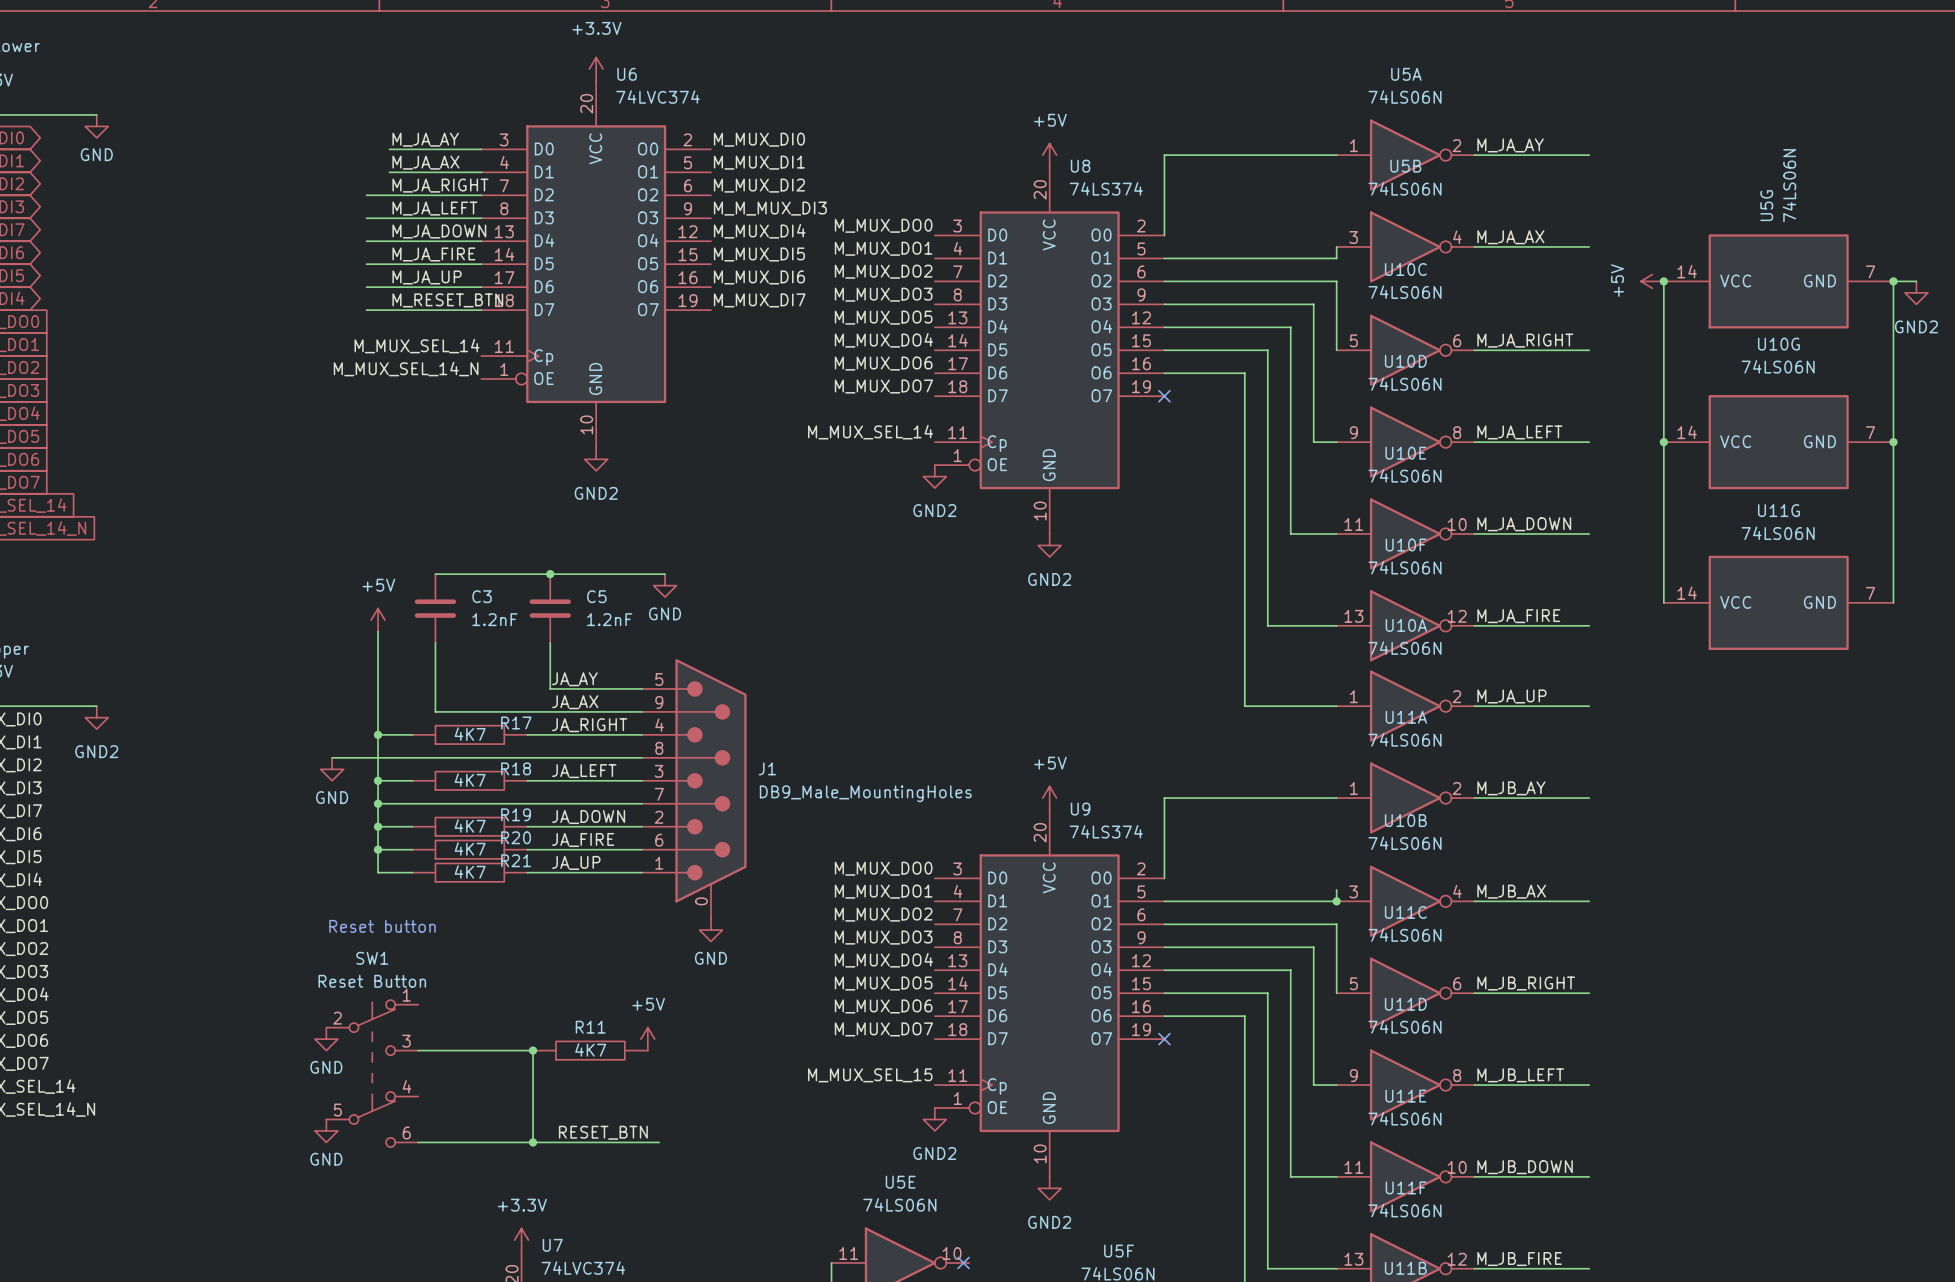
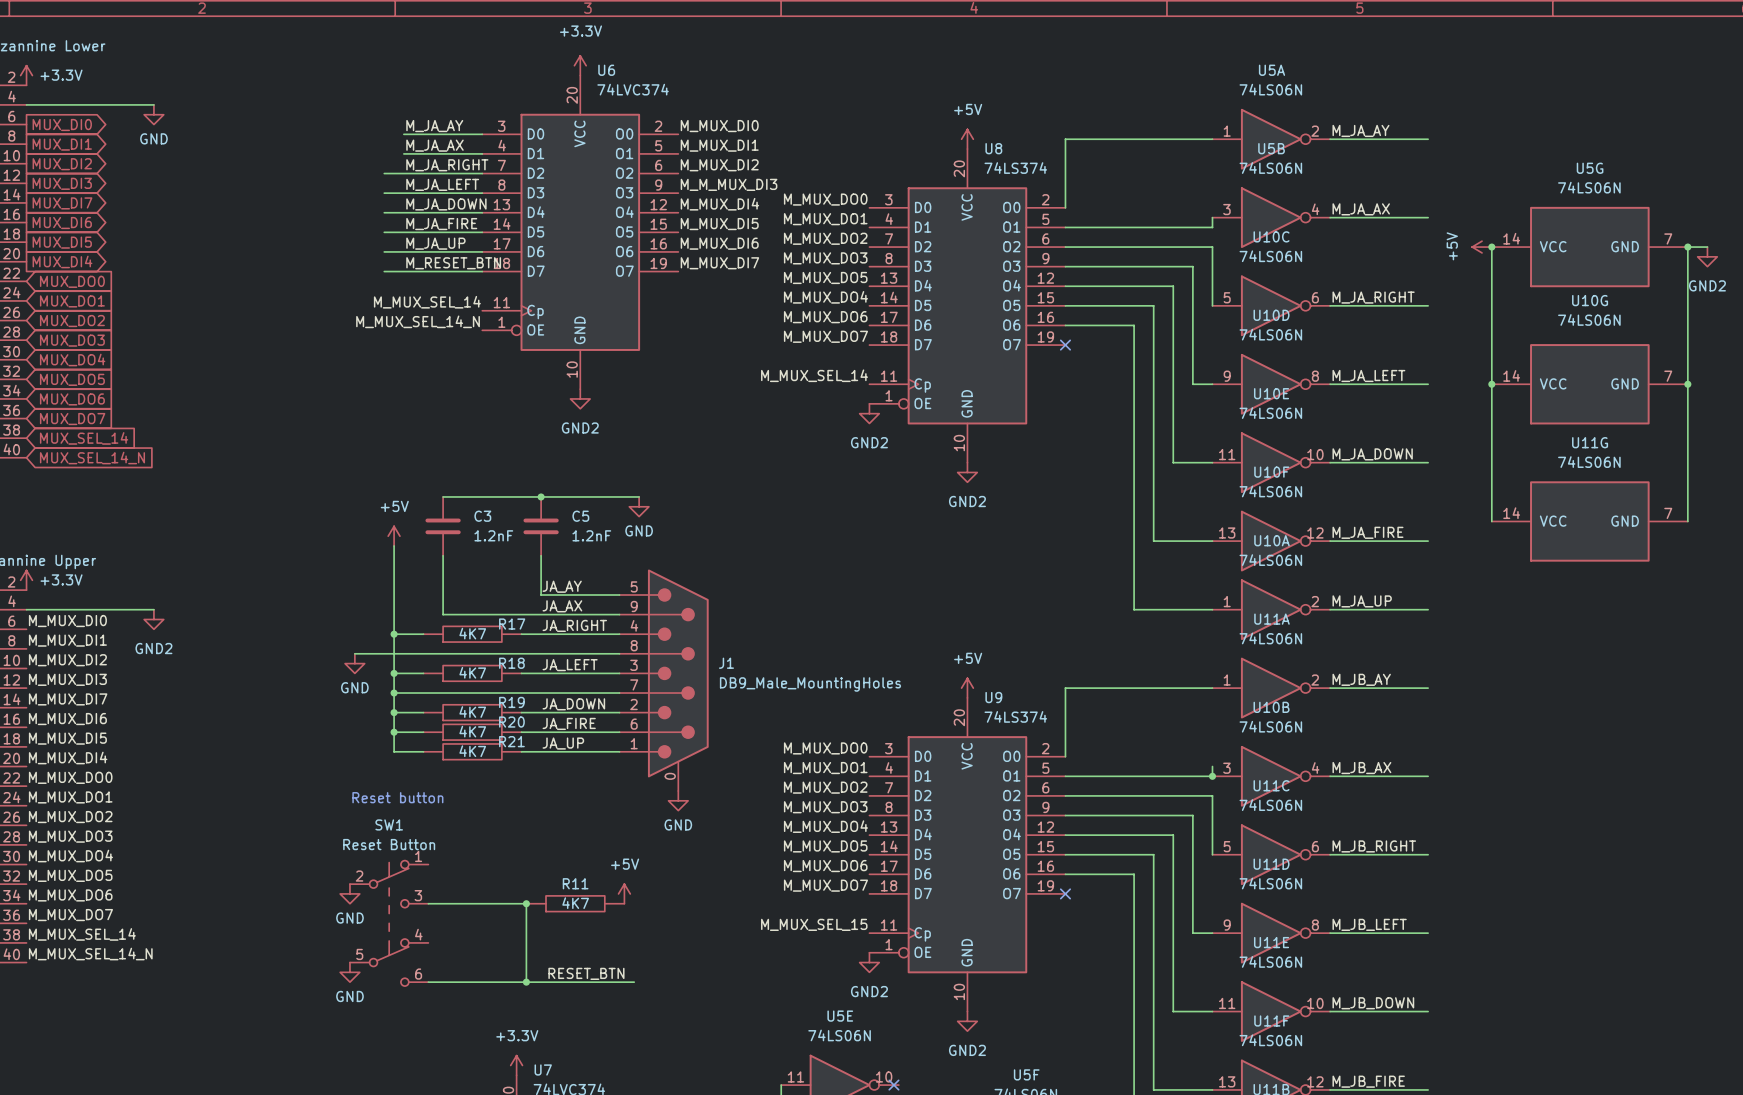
U5G value rotation: 0° (1789, 185) -> 90° clockwise (1589, 187)
U5G name rotation: 0° (1766, 205) -> 90° clockwise (1590, 168)

